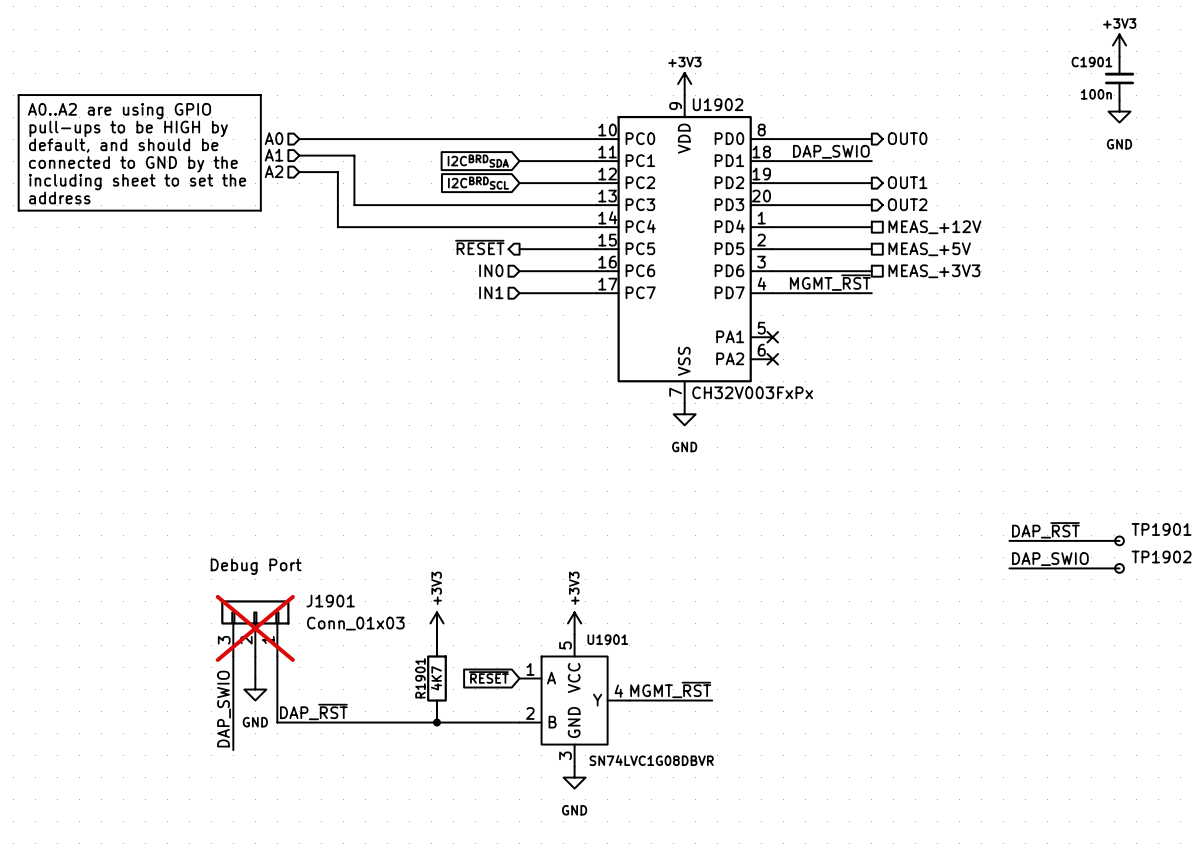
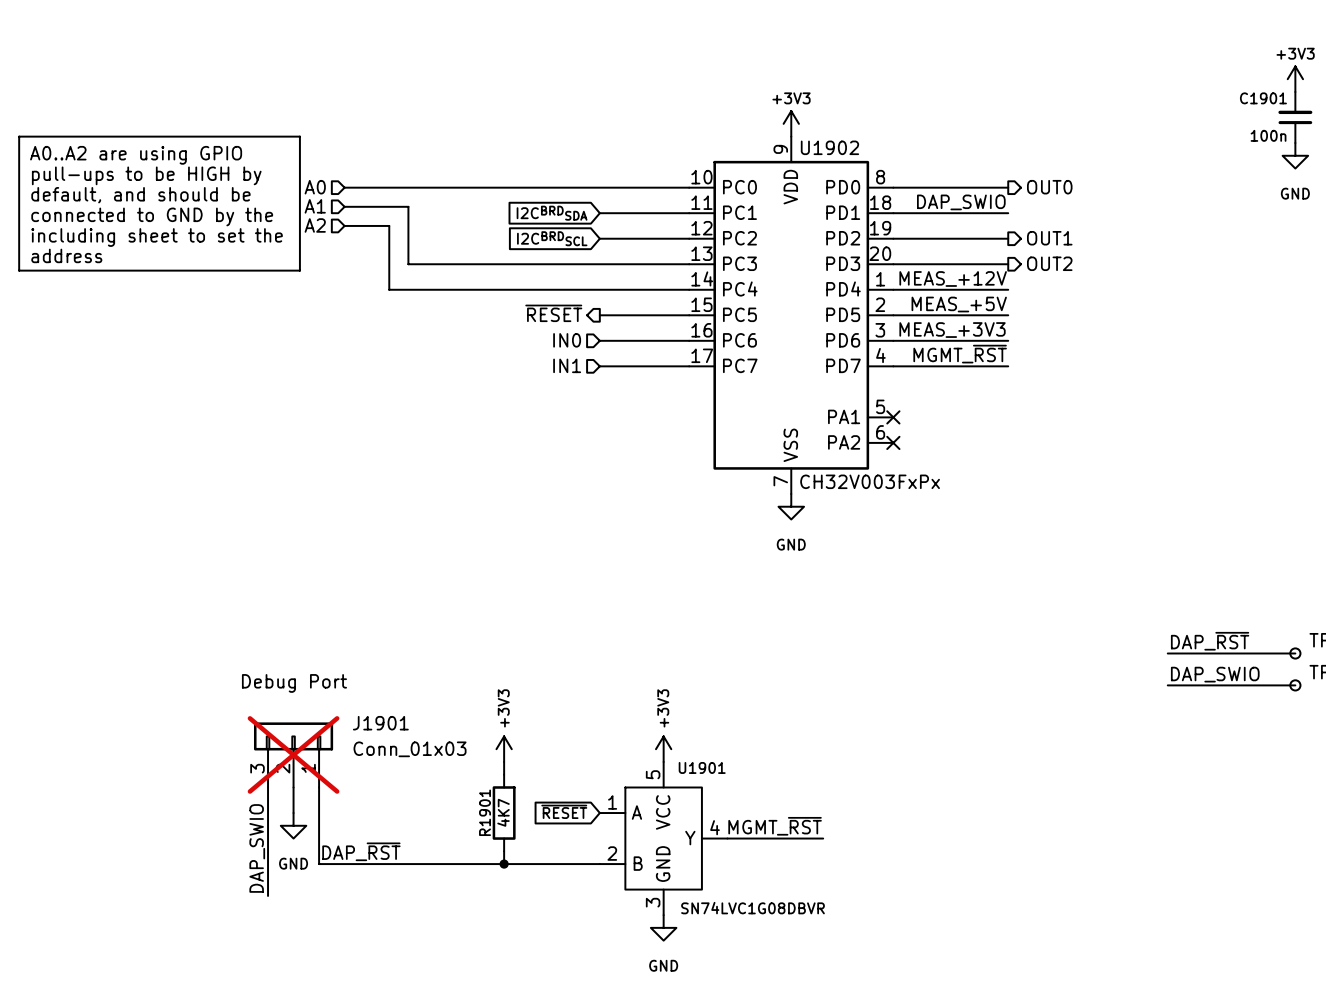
label: none -> MEAS_+12V (953, 278)
hierarchical label: MEAS_+12V (934, 227) -> none
label: none -> MEAS_+5V (959, 304)
hierarchical label: MEAS_+5V (929, 249) -> none
label: none -> MEAS_+3V3 (952, 330)
hierarchical label: MEAS_+3V3 (934, 271) -> none

